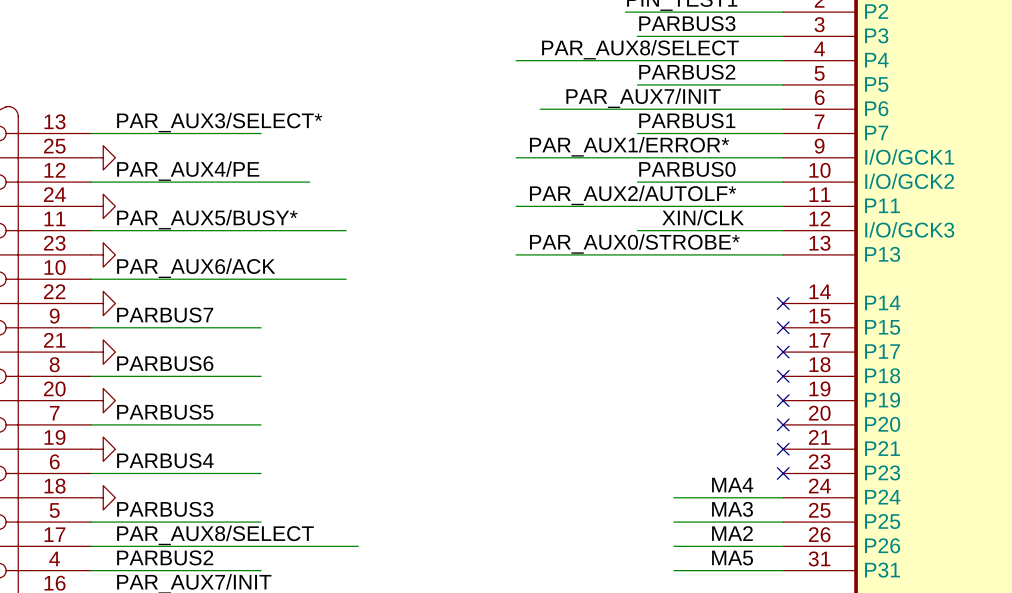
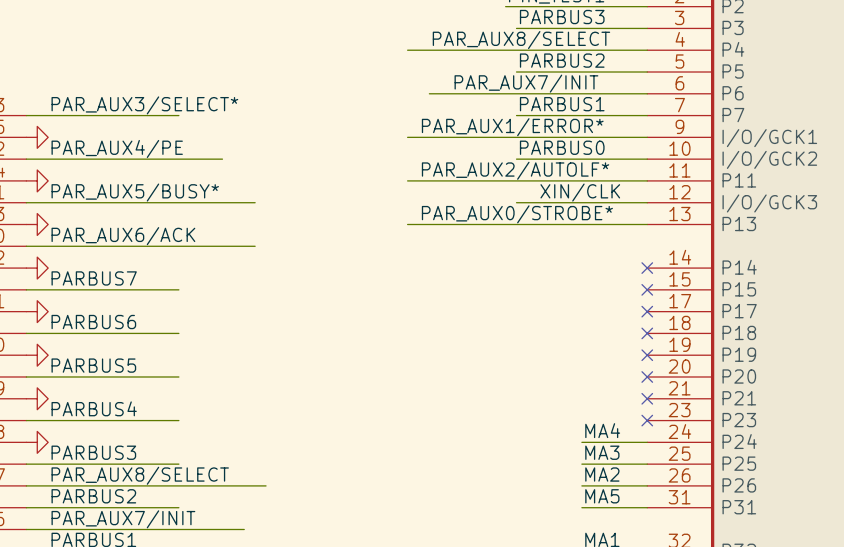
wire: (673, 497) (710, 497) -> none
wire: (673, 522) (710, 522) -> none
wire: (673, 546) (710, 546) -> none
wire: (673, 570) (710, 570) -> none

